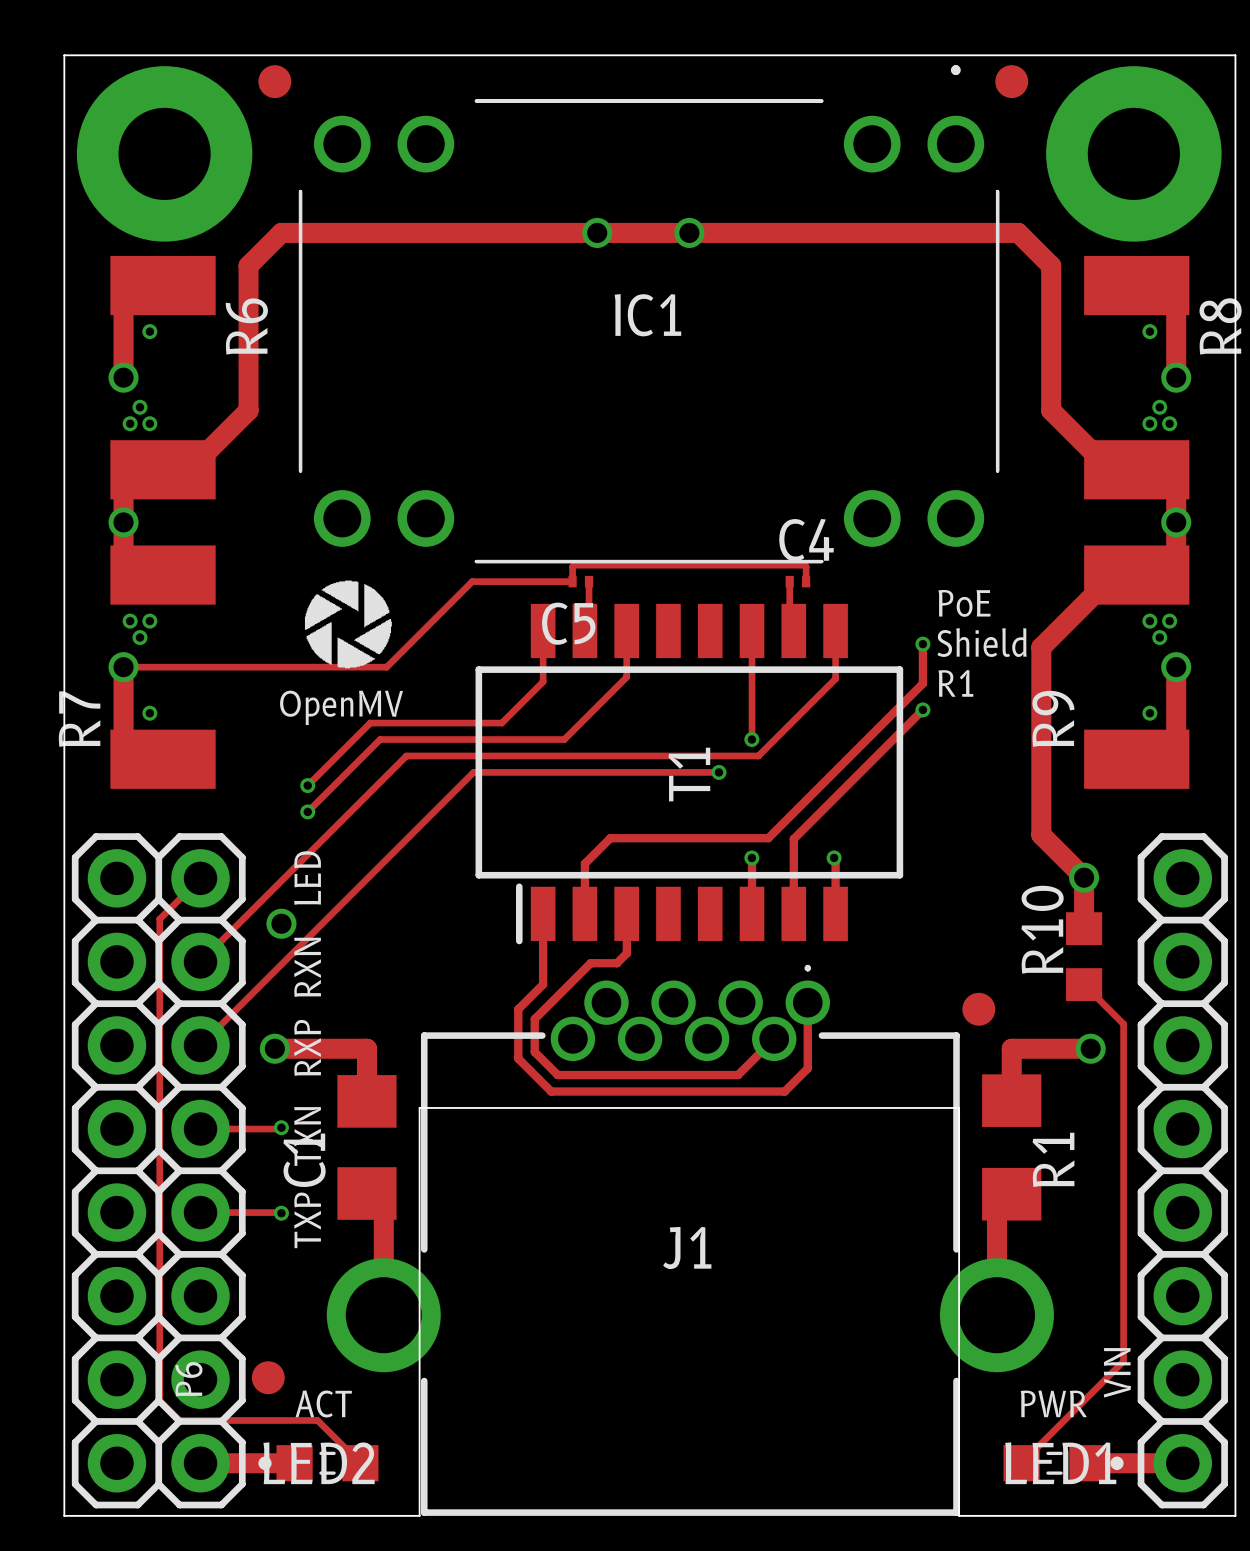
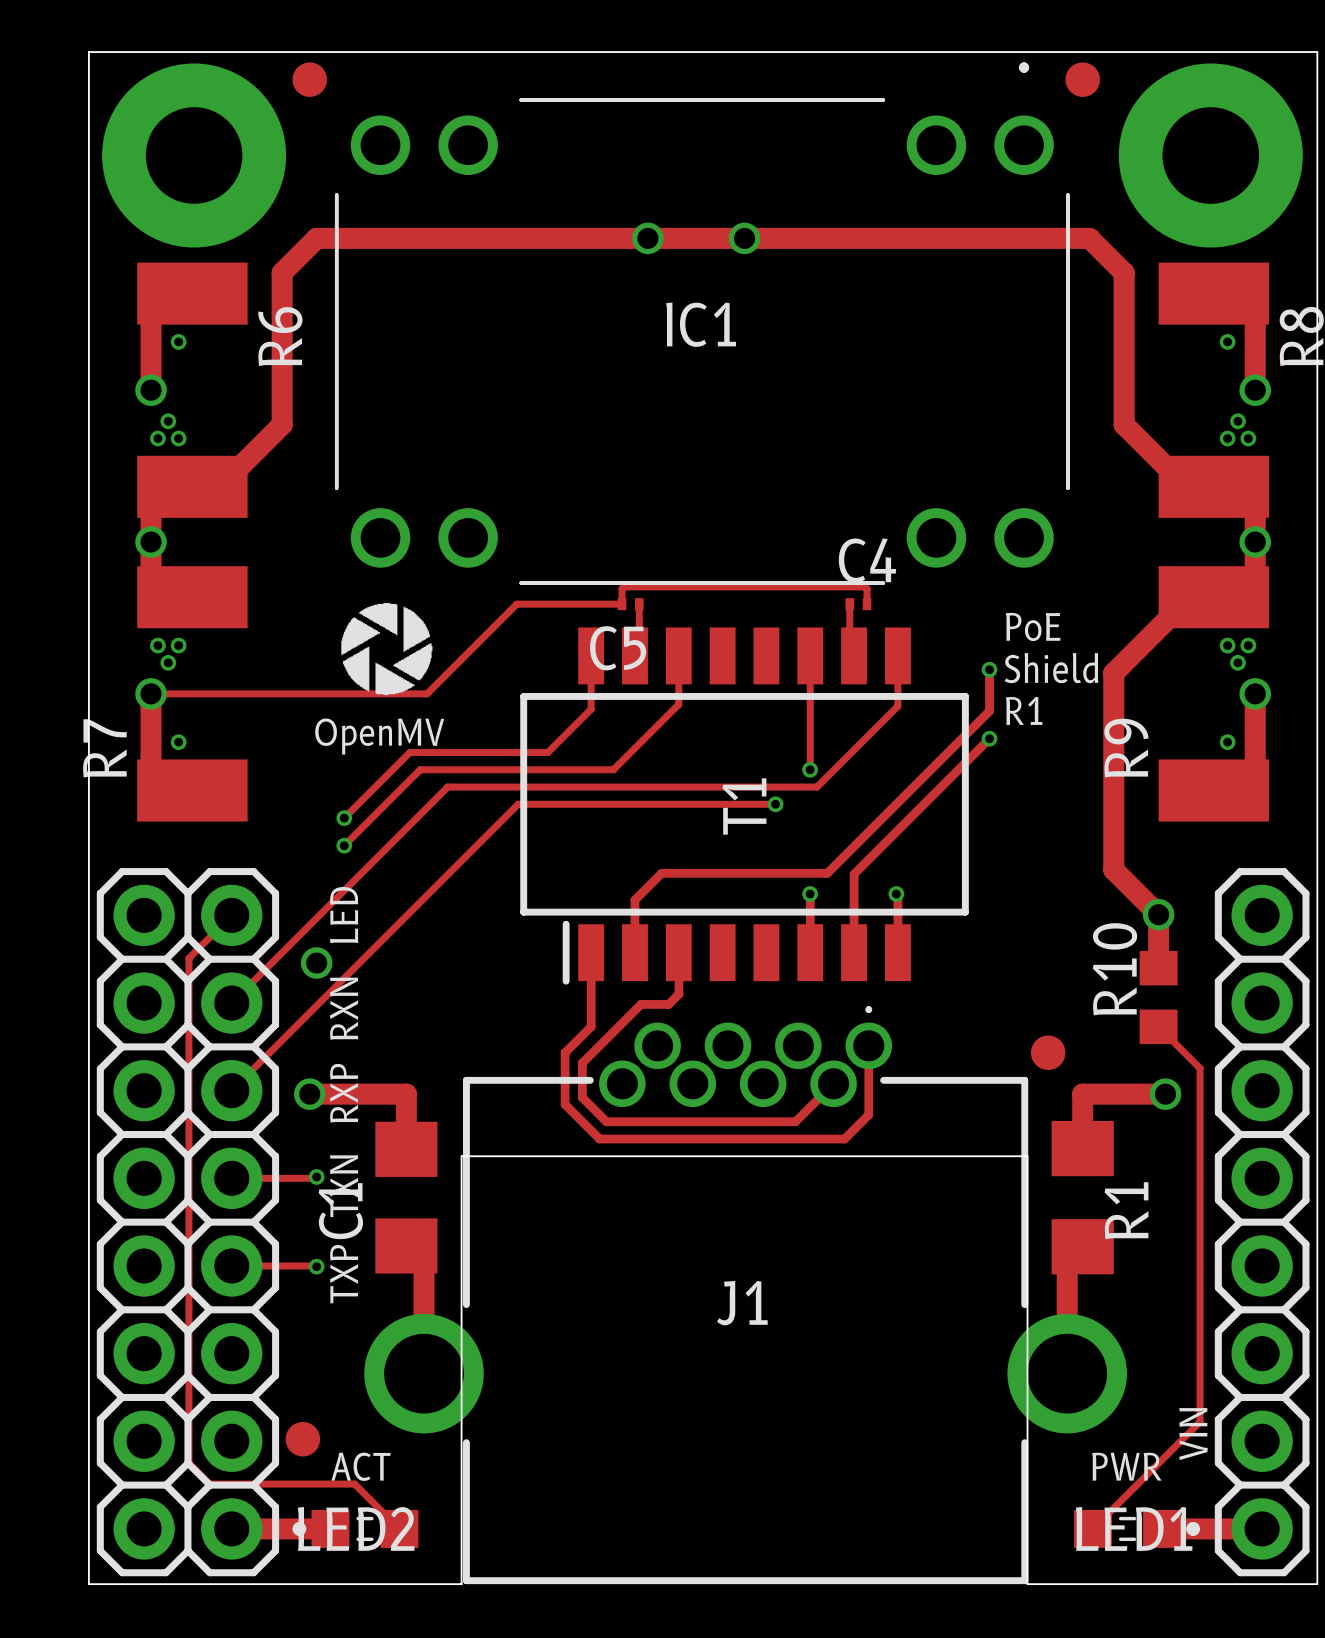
text: P6 (189, 1379) -> none

